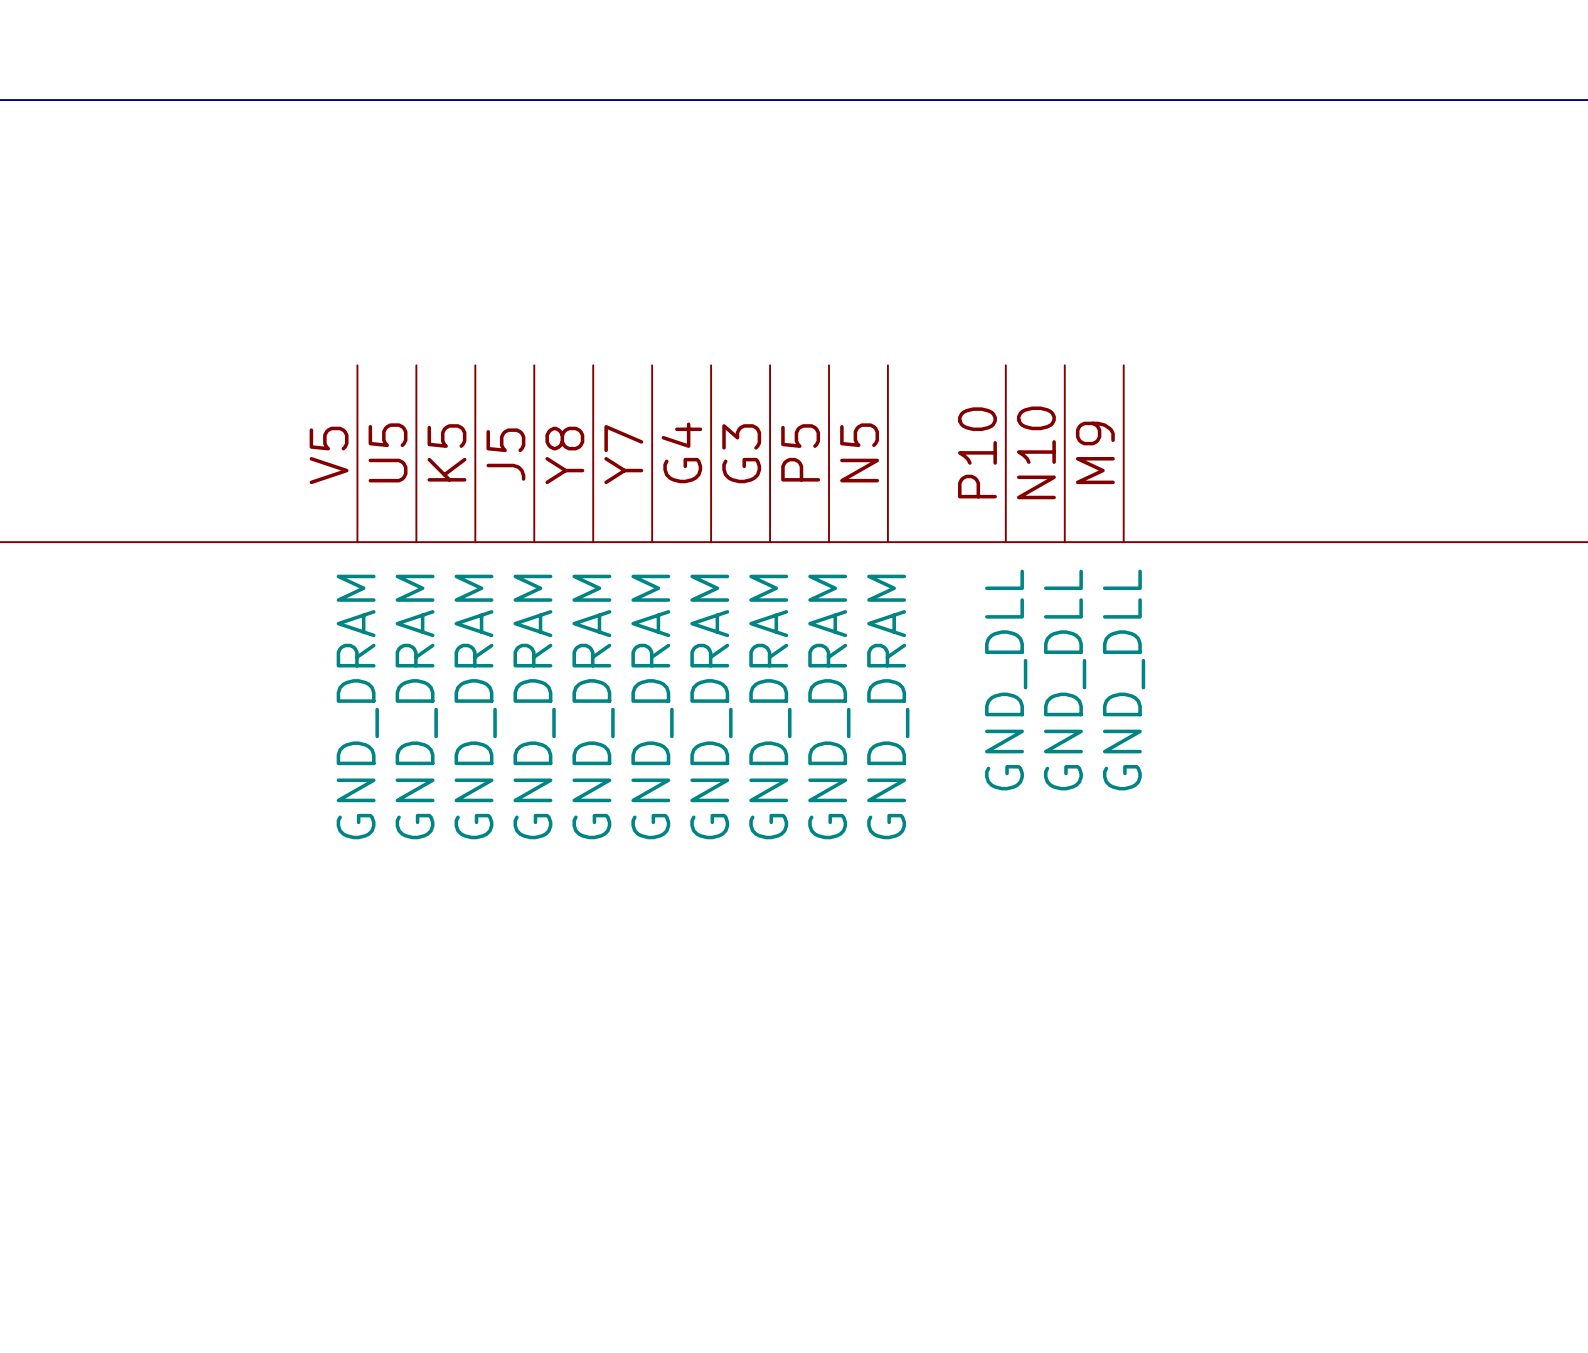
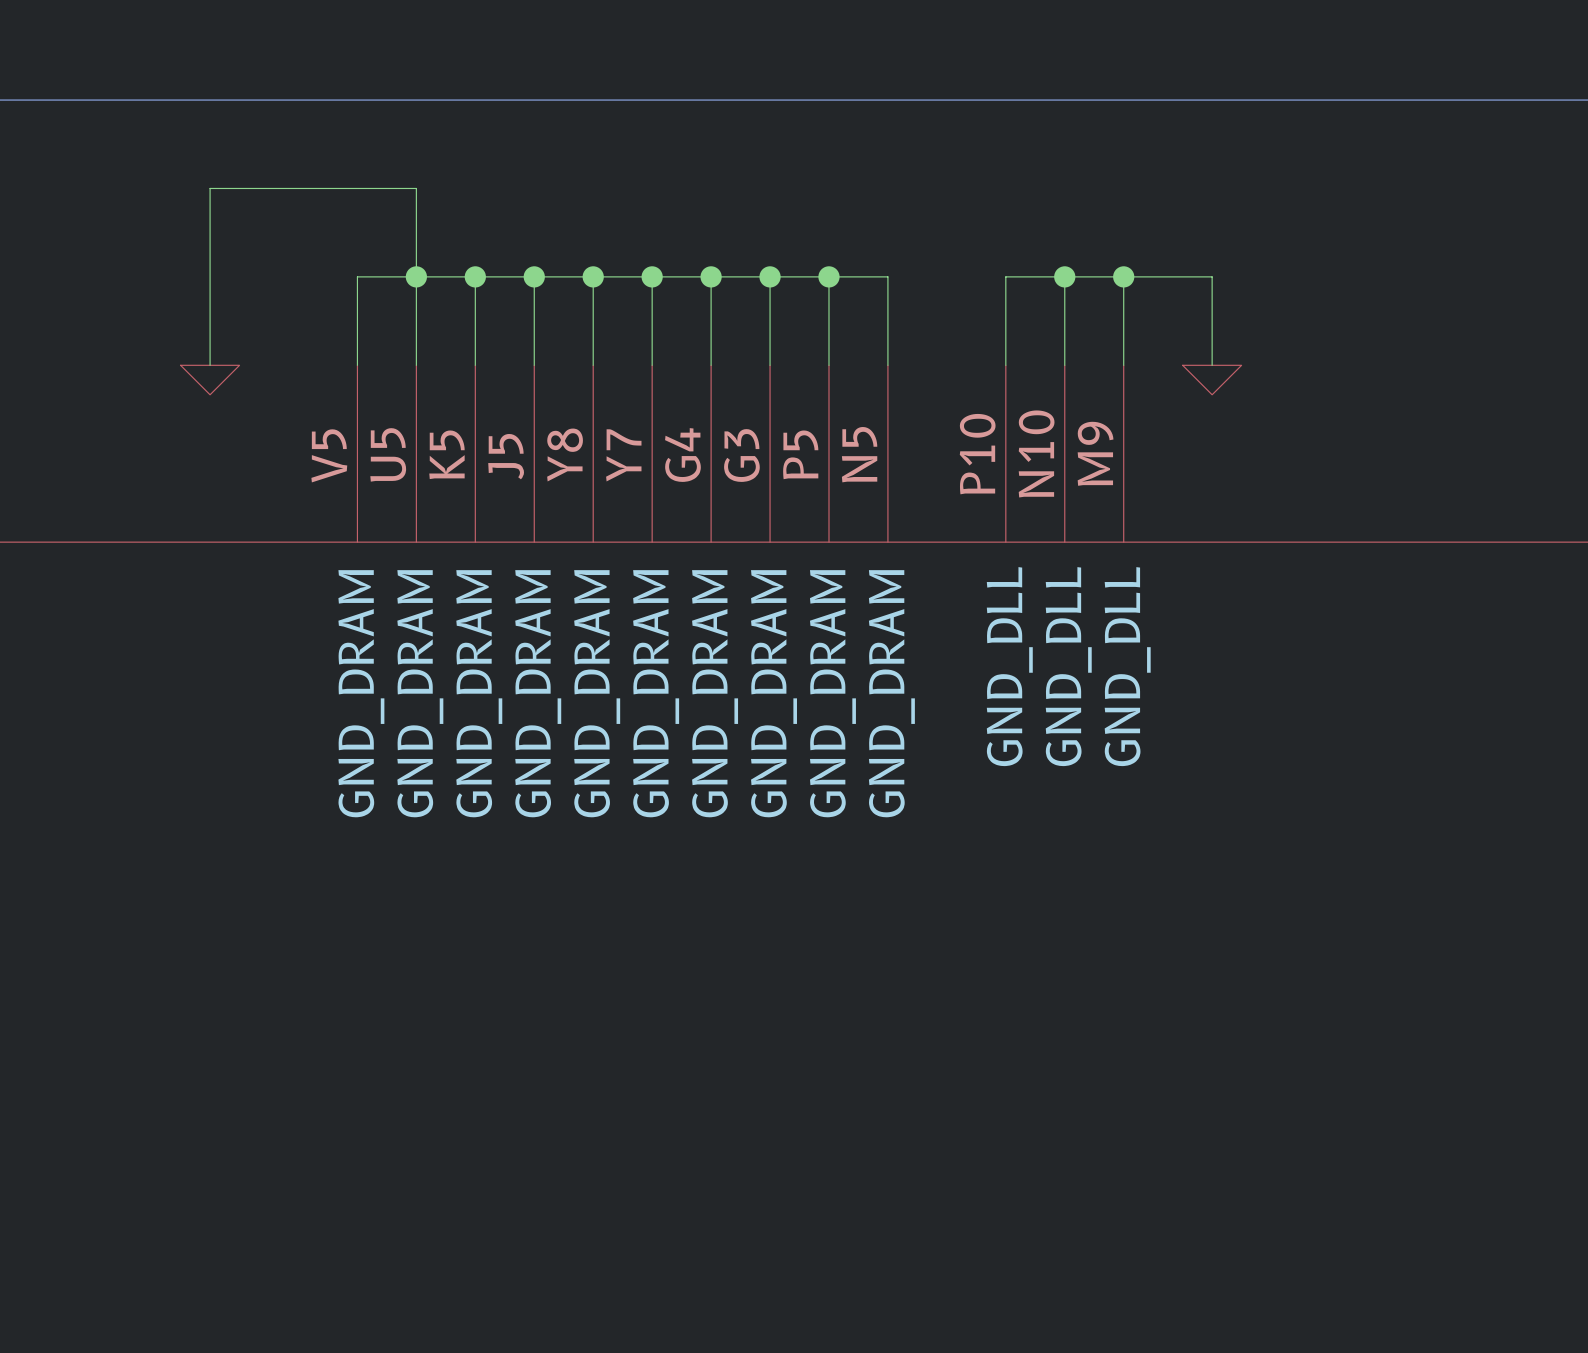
junction: none -> (416, 276)
wire: none -> (475, 276) (475, 365)
junction: none -> (475, 276)
wire: none -> (534, 276) (534, 365)
junction: none -> (534, 276)
wire: none -> (593, 276) (593, 365)
junction: none -> (593, 276)
wire: none -> (652, 276) (652, 365)
junction: none -> (652, 276)
wire: none -> (711, 276) (711, 365)
junction: none -> (711, 276)
wire: none -> (770, 276) (770, 365)
junction: none -> (770, 276)
wire: none -> (828, 276) (828, 365)
junction: none -> (828, 276)
wire: none -> (1064, 276) (1064, 365)
junction: none -> (1064, 276)
wire: none -> (1123, 276) (1123, 365)
junction: none -> (1123, 276)
wire: none -> (210, 365) (210, 188) (416, 188) (416, 365)
wire: none -> (357, 365) (357, 276) (887, 276) (887, 365)
wire: none -> (1005, 365) (1005, 276) (1212, 276) (1212, 365)
power symbol: none -> (210, 380)
power symbol: none -> (1212, 380)

